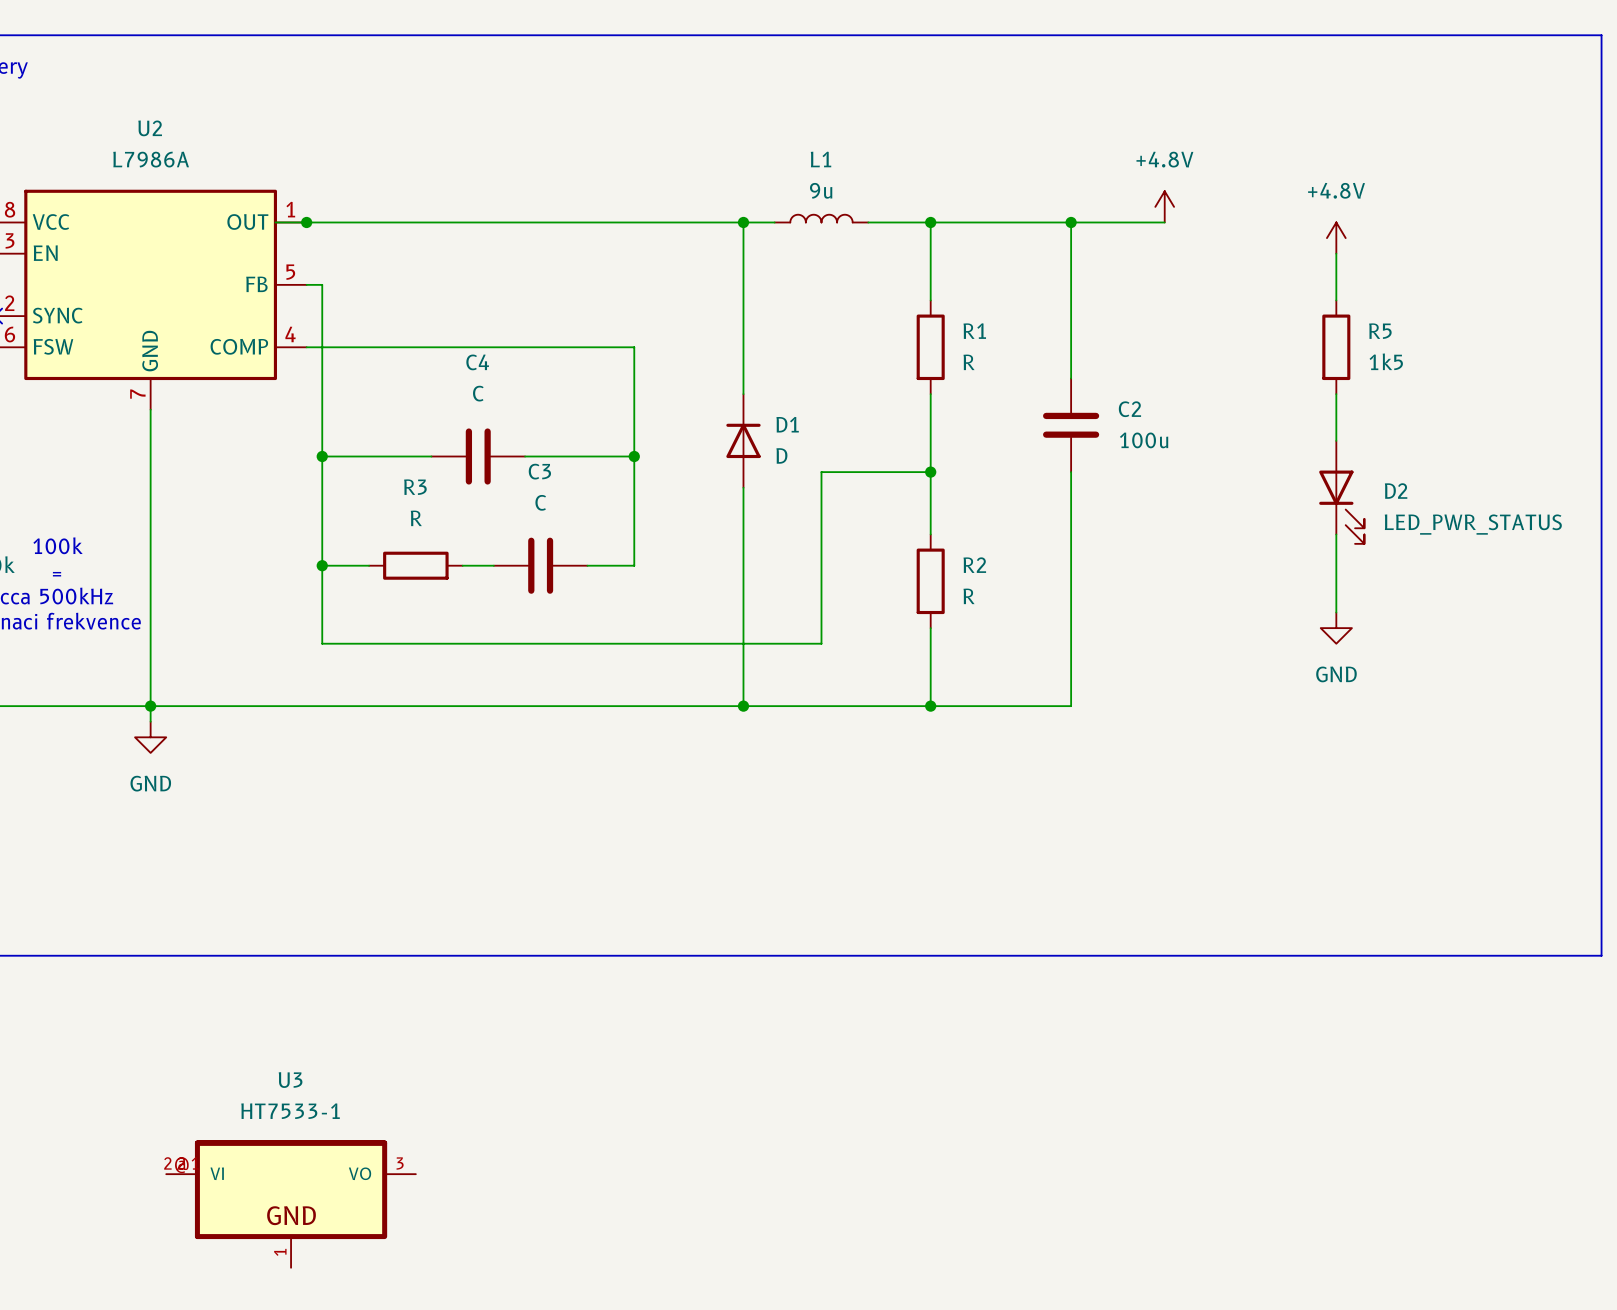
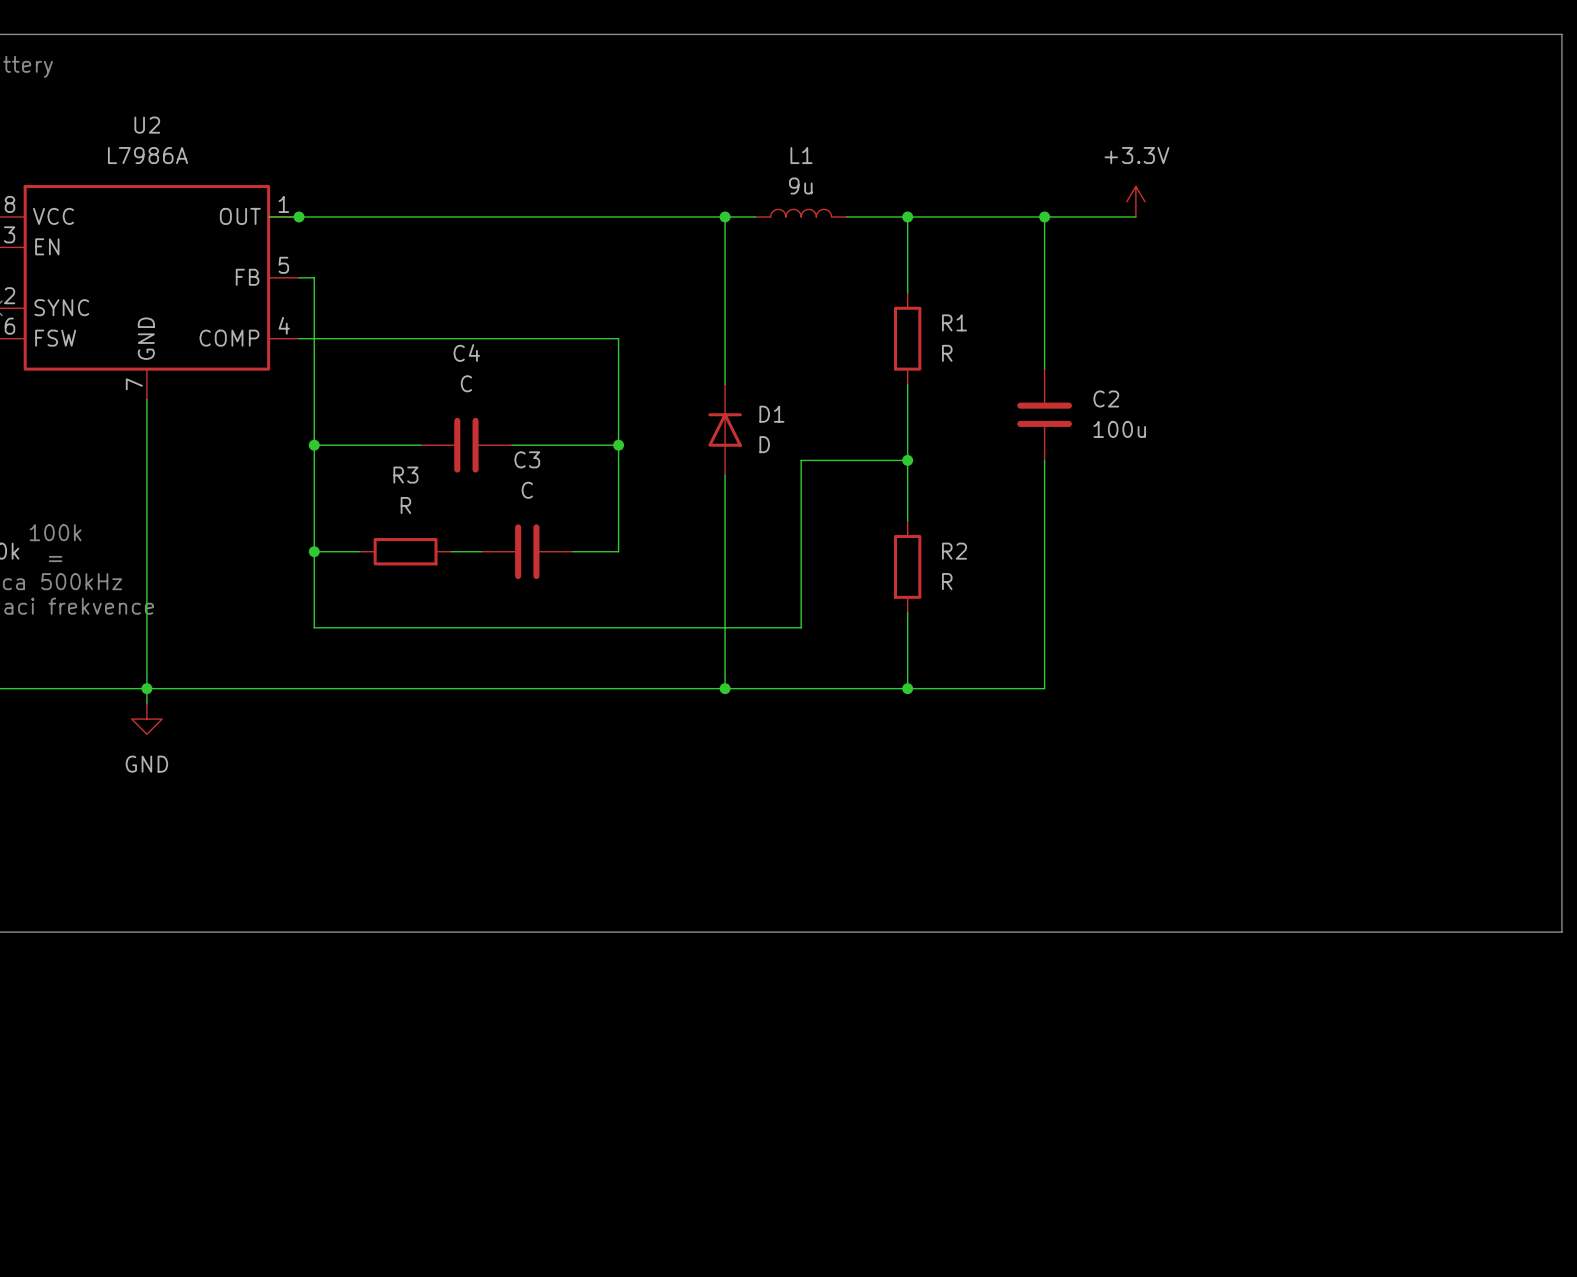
power symbol: +4.8V (1164, 206) -> +3.3V (1135, 201)
power symbol: +4.8V (1336, 238) -> none
wire: (1336, 253) (1336, 300) -> none
R5: 1k5 (1336, 347) -> none
wire: (1336, 394) (1336, 440) -> none
D2: LED_PWR_STATUS (1341, 492) -> none
wire: (1336, 534) (1336, 612) -> none
power symbol: GND (1336, 628) -> none
U3: HT7533-1 (291, 1204) -> none

